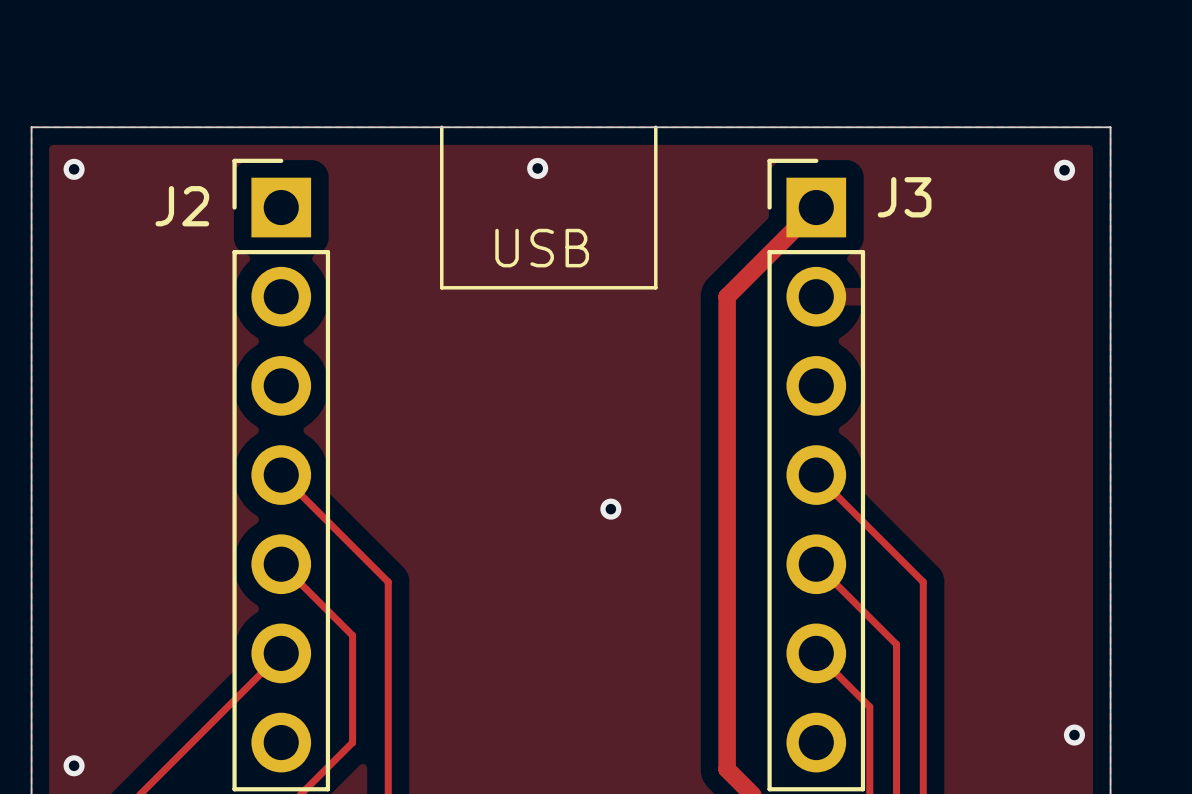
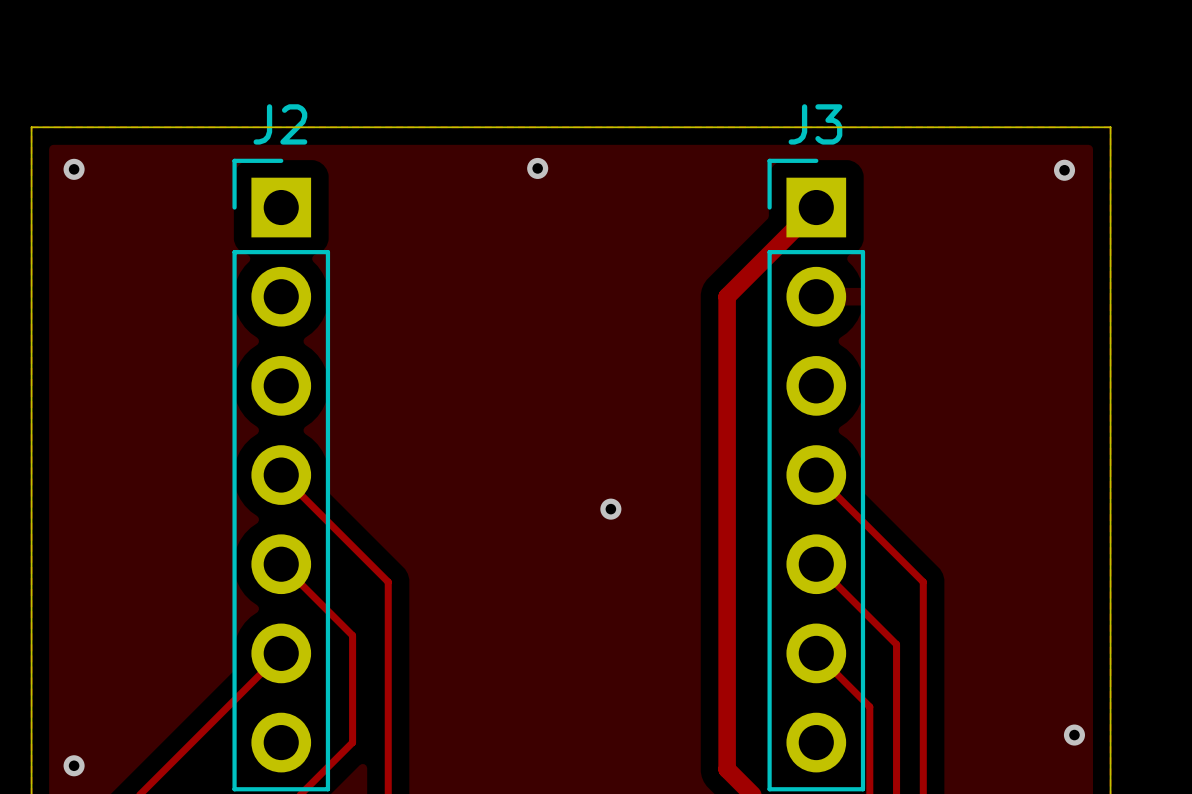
line: (441, 127) (441, 287) (655, 287) (655, 127) -> none
J3 name position: J3 (904, 197) -> J3 (815, 124)
J2 name position: J2 (182, 206) -> J2 (280, 124)
text: USB (542, 248) -> none

